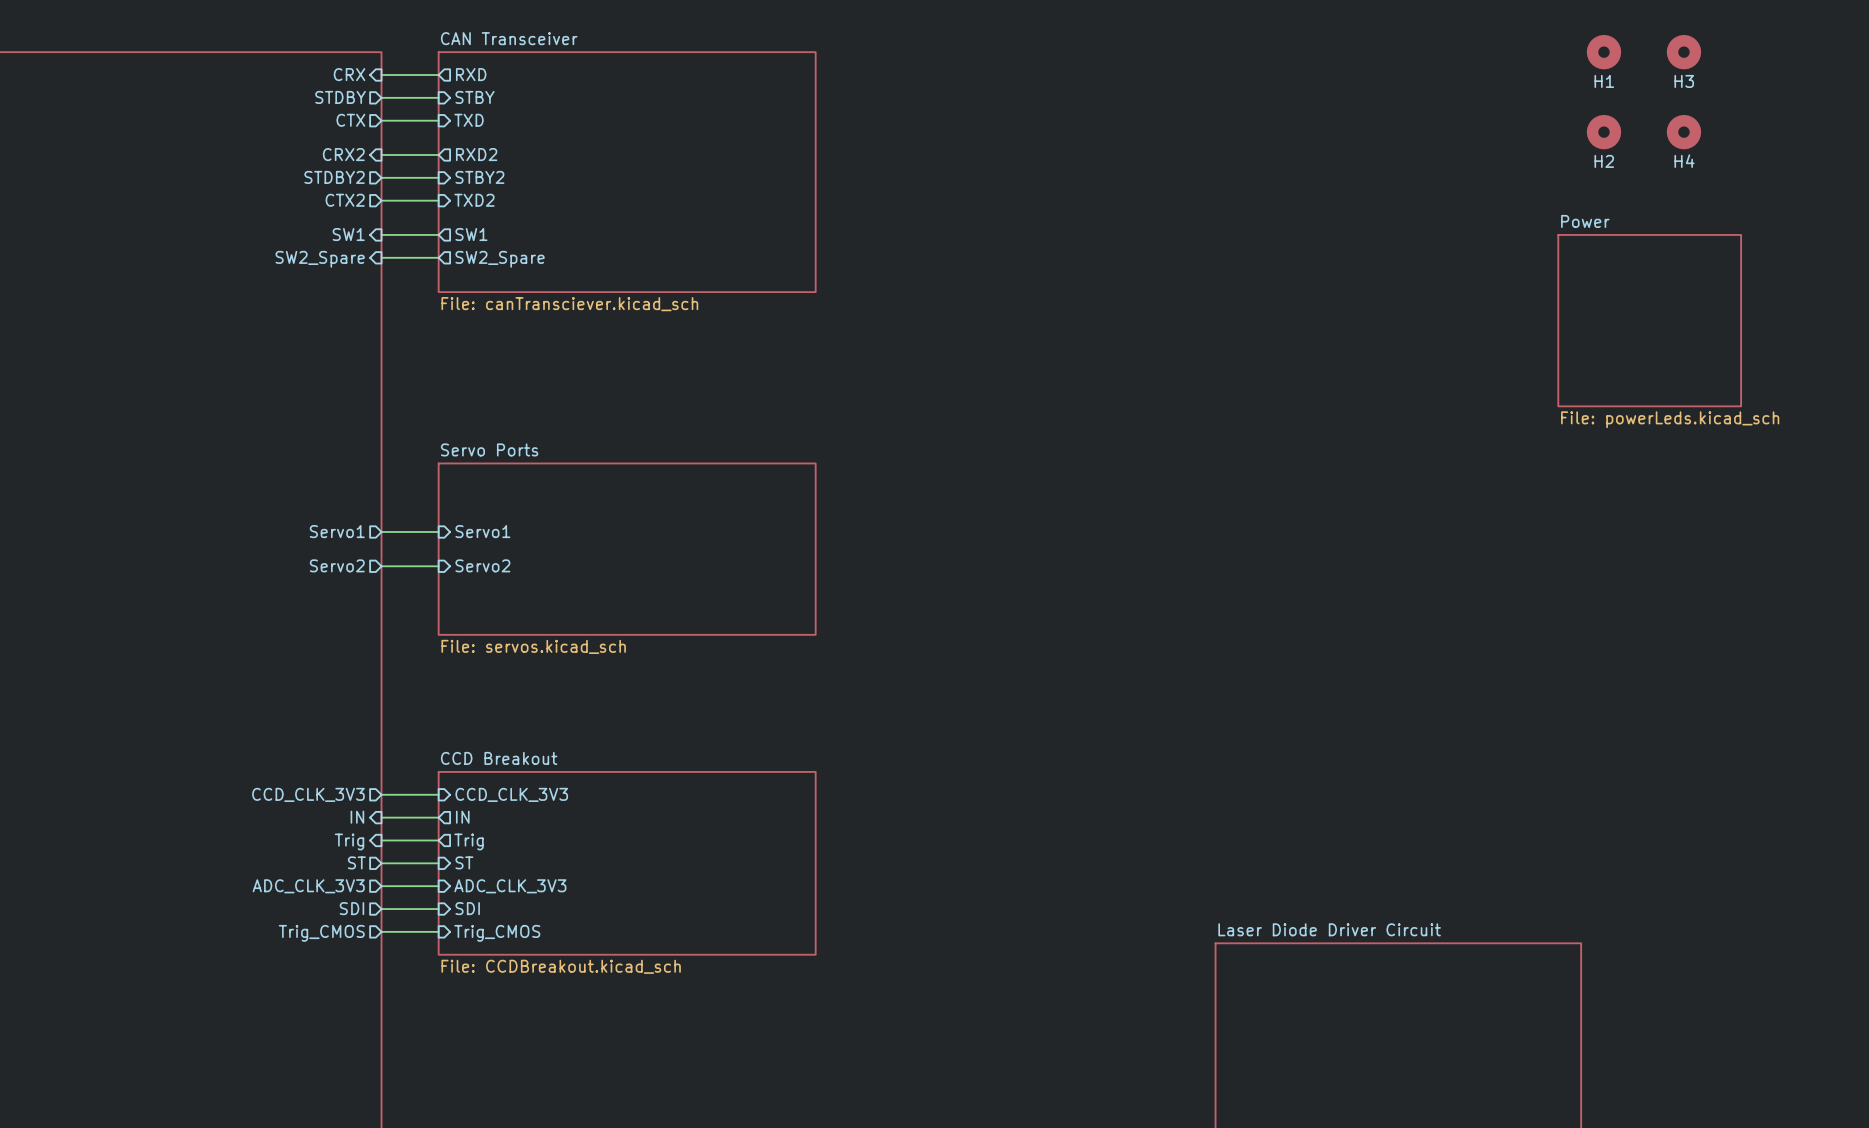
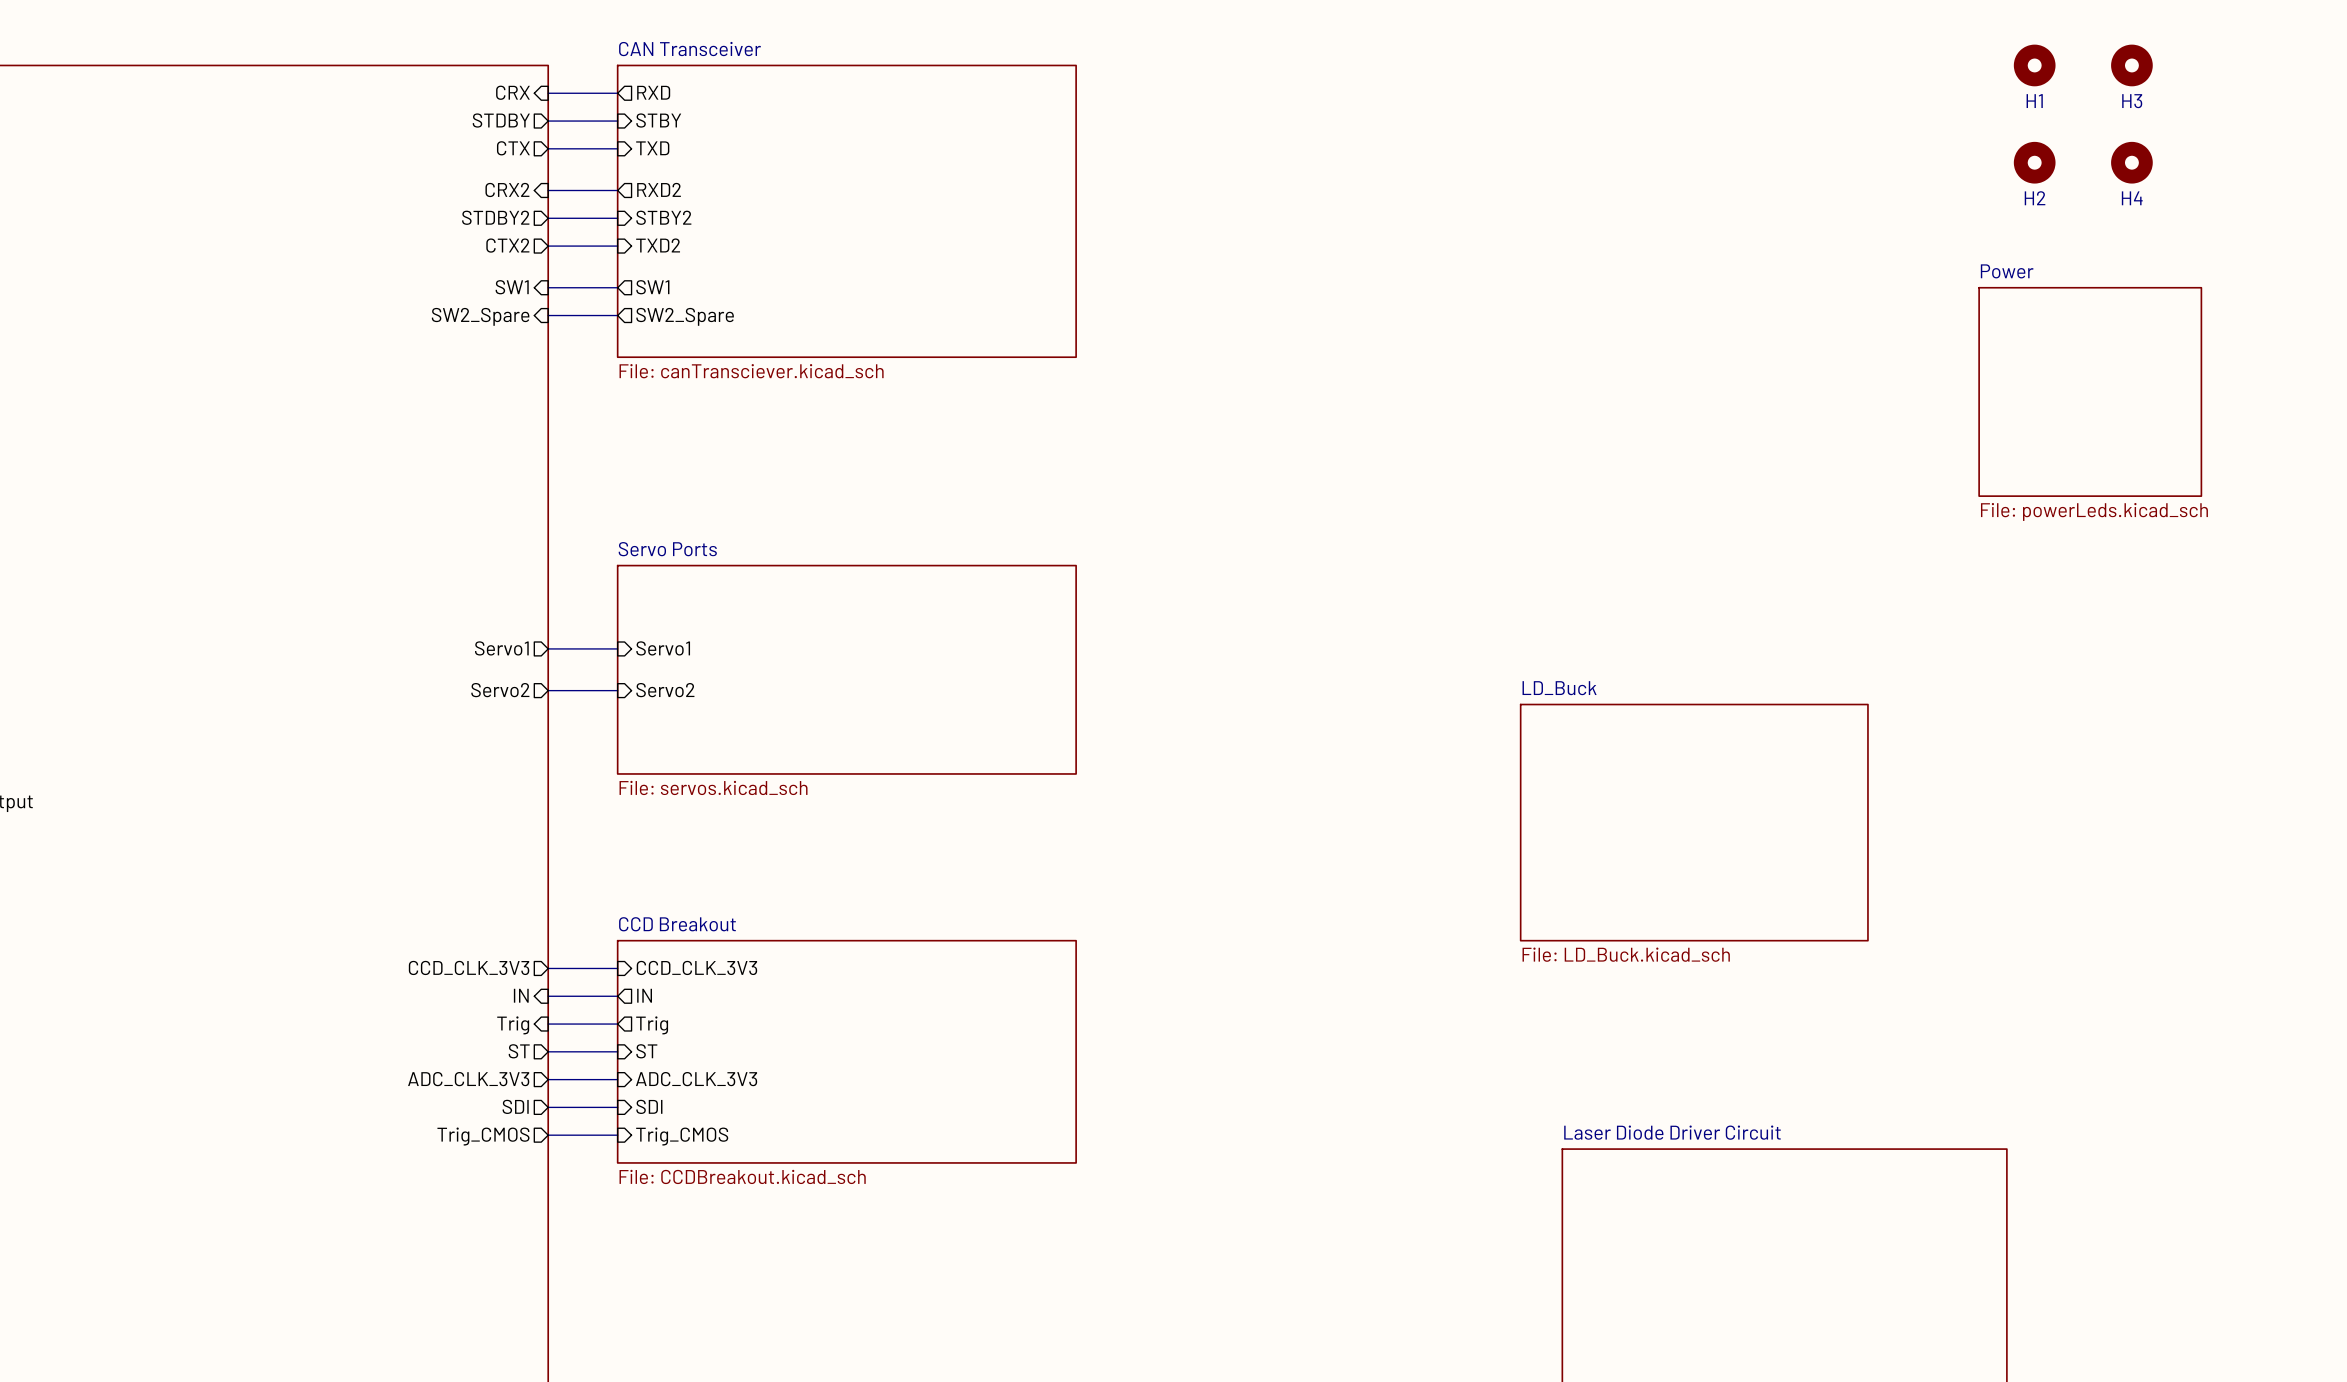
sheet LD_Buck: none -> File: LD_Buck.kicad_sch (1694, 822)

